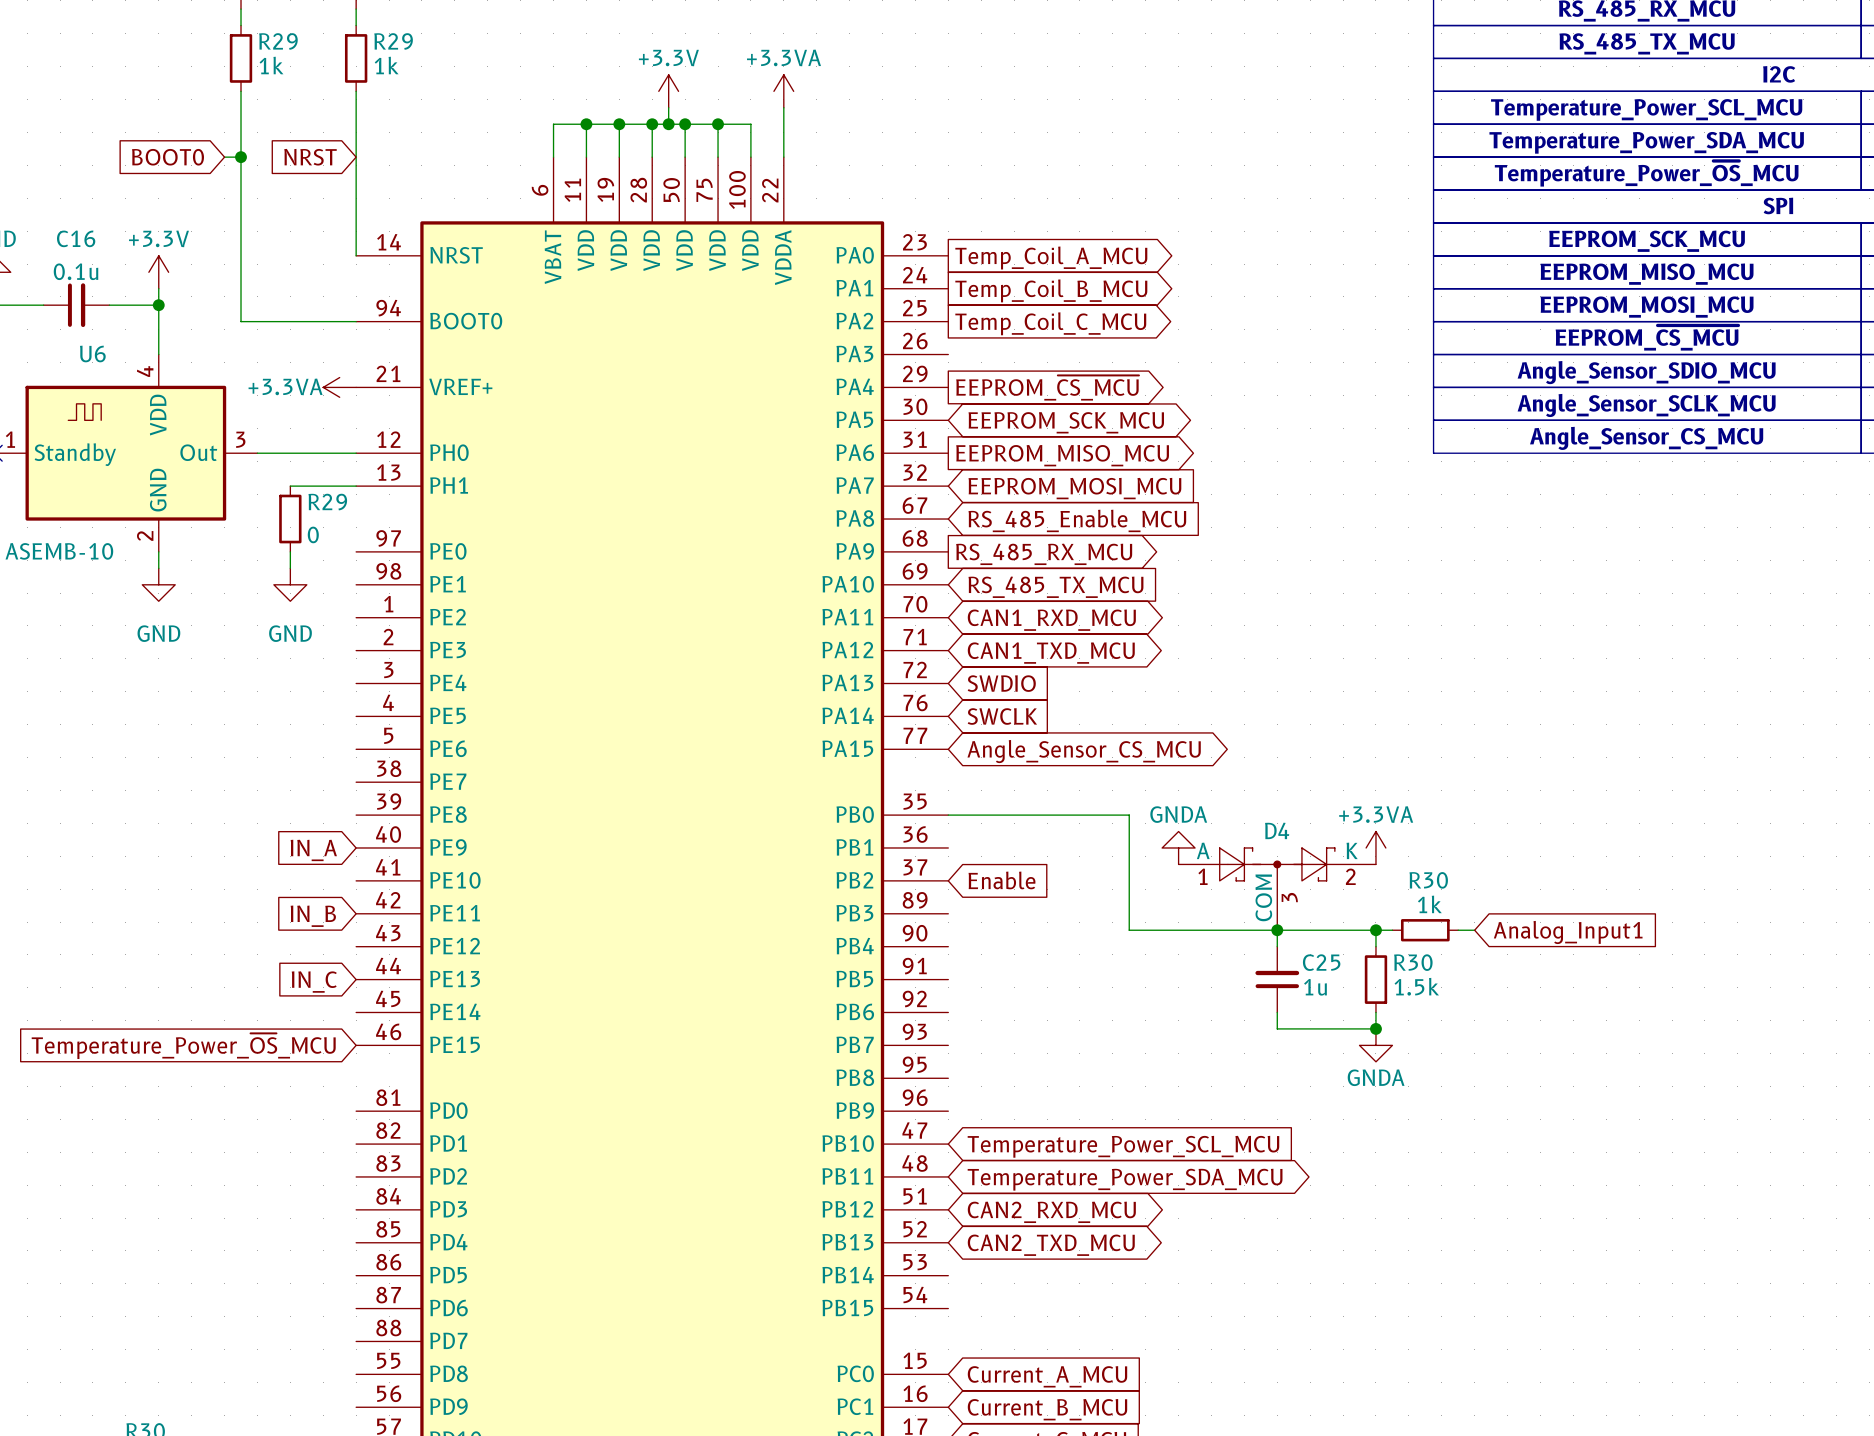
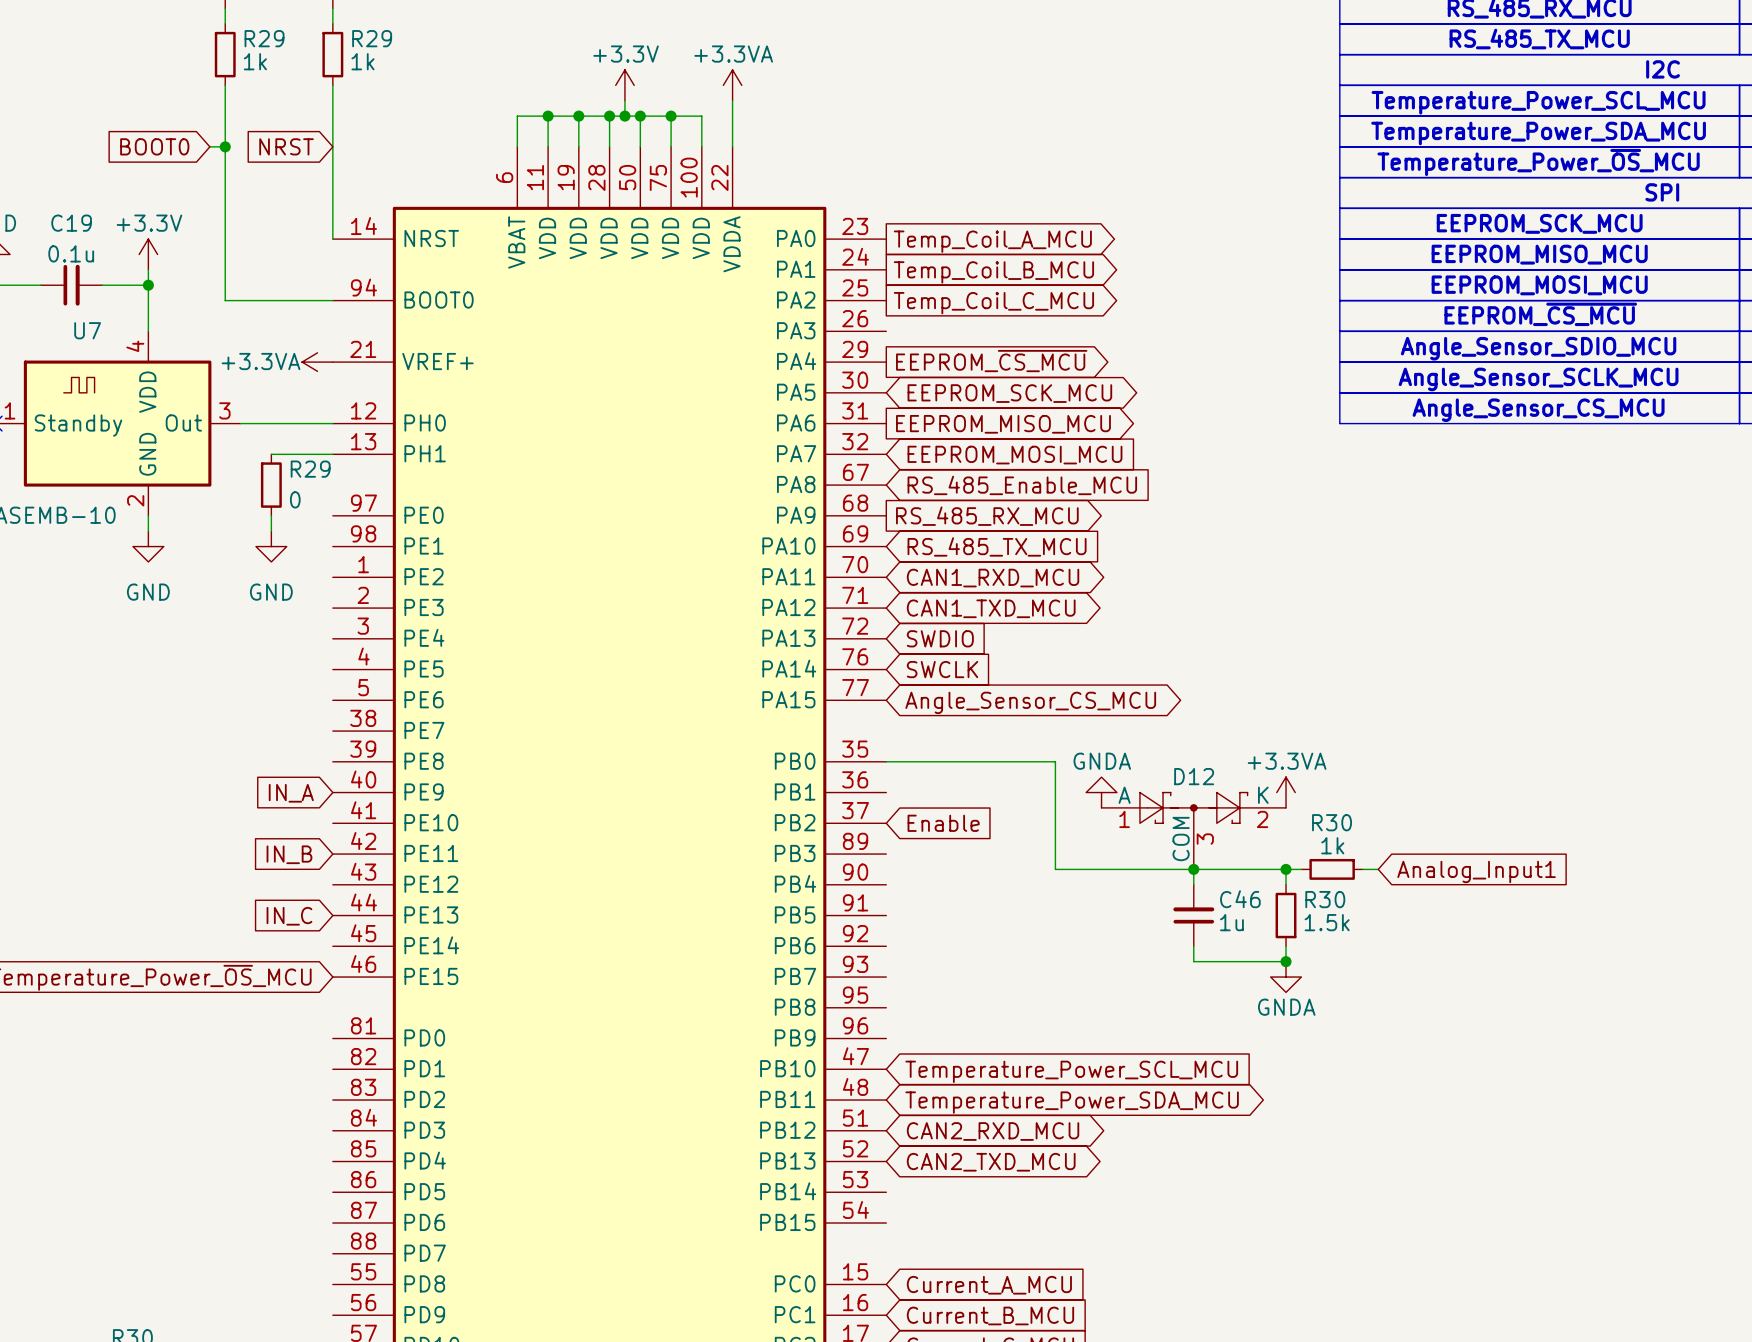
C16 name: C16 (76, 238) -> C19 (71, 223)
U6 name: U6 (92, 353) -> U7 (87, 330)
D4 name: D4 (1277, 830) -> D12 (1194, 776)
C25 name: C25 (1321, 962) -> C46 (1240, 899)

